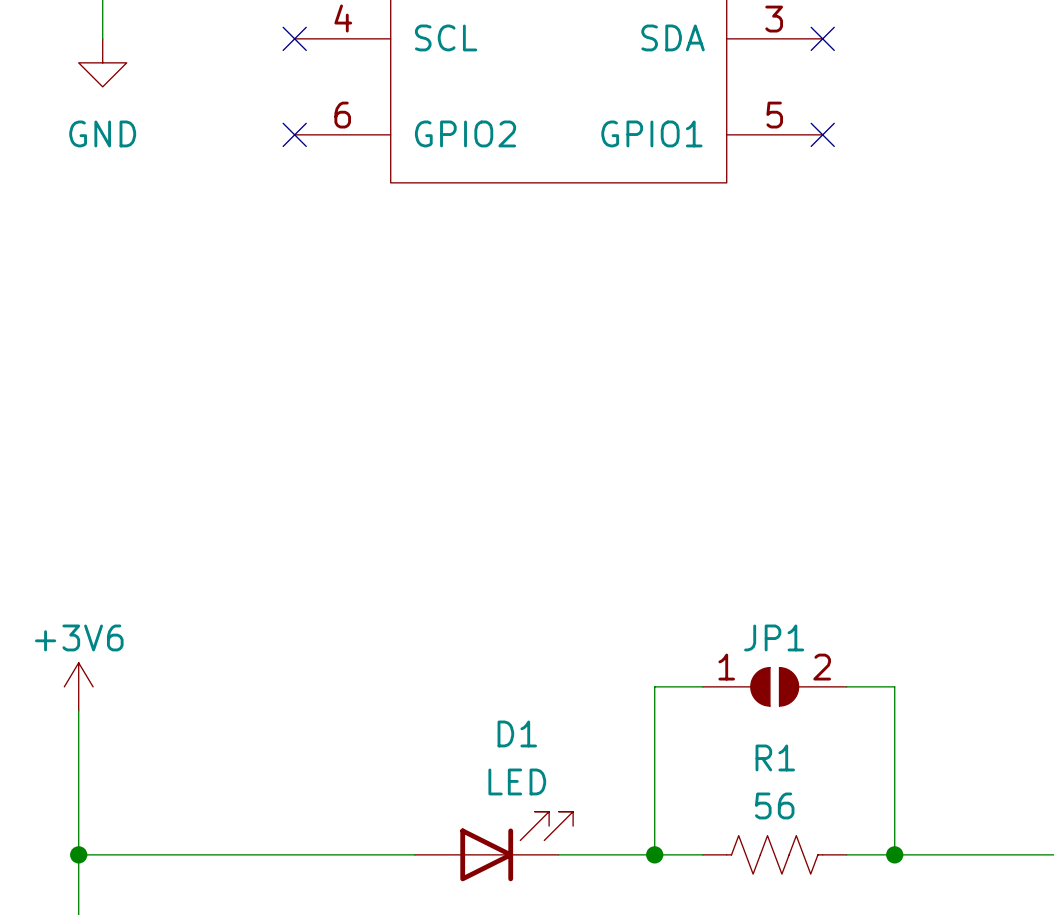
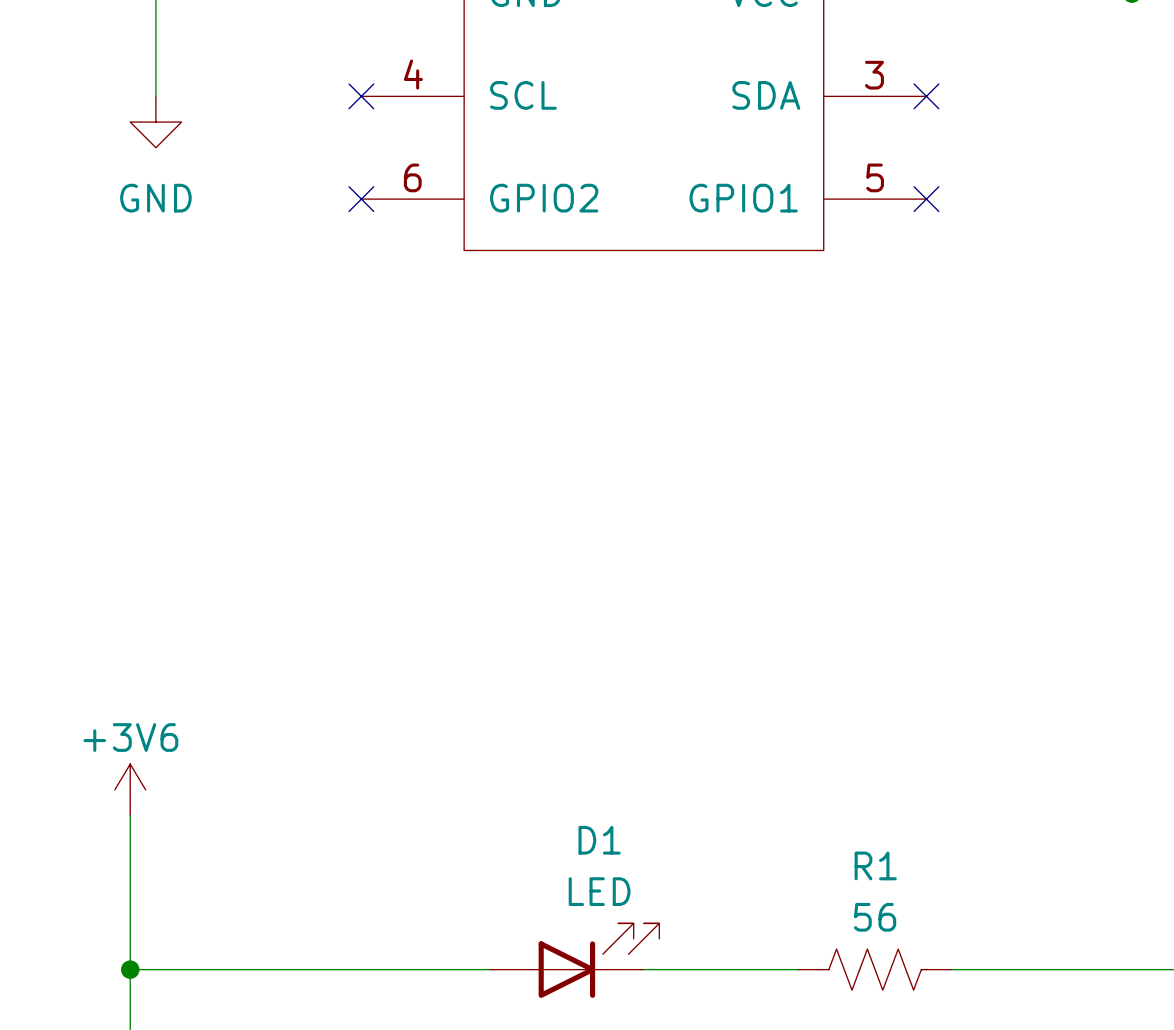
wire: (702, 686) (654, 686) (654, 854) -> none
JP1: (774, 686) -> none
wire: (846, 686) (894, 686) (894, 854) -> none
junction: (654, 854) -> none
junction: (894, 854) -> none

